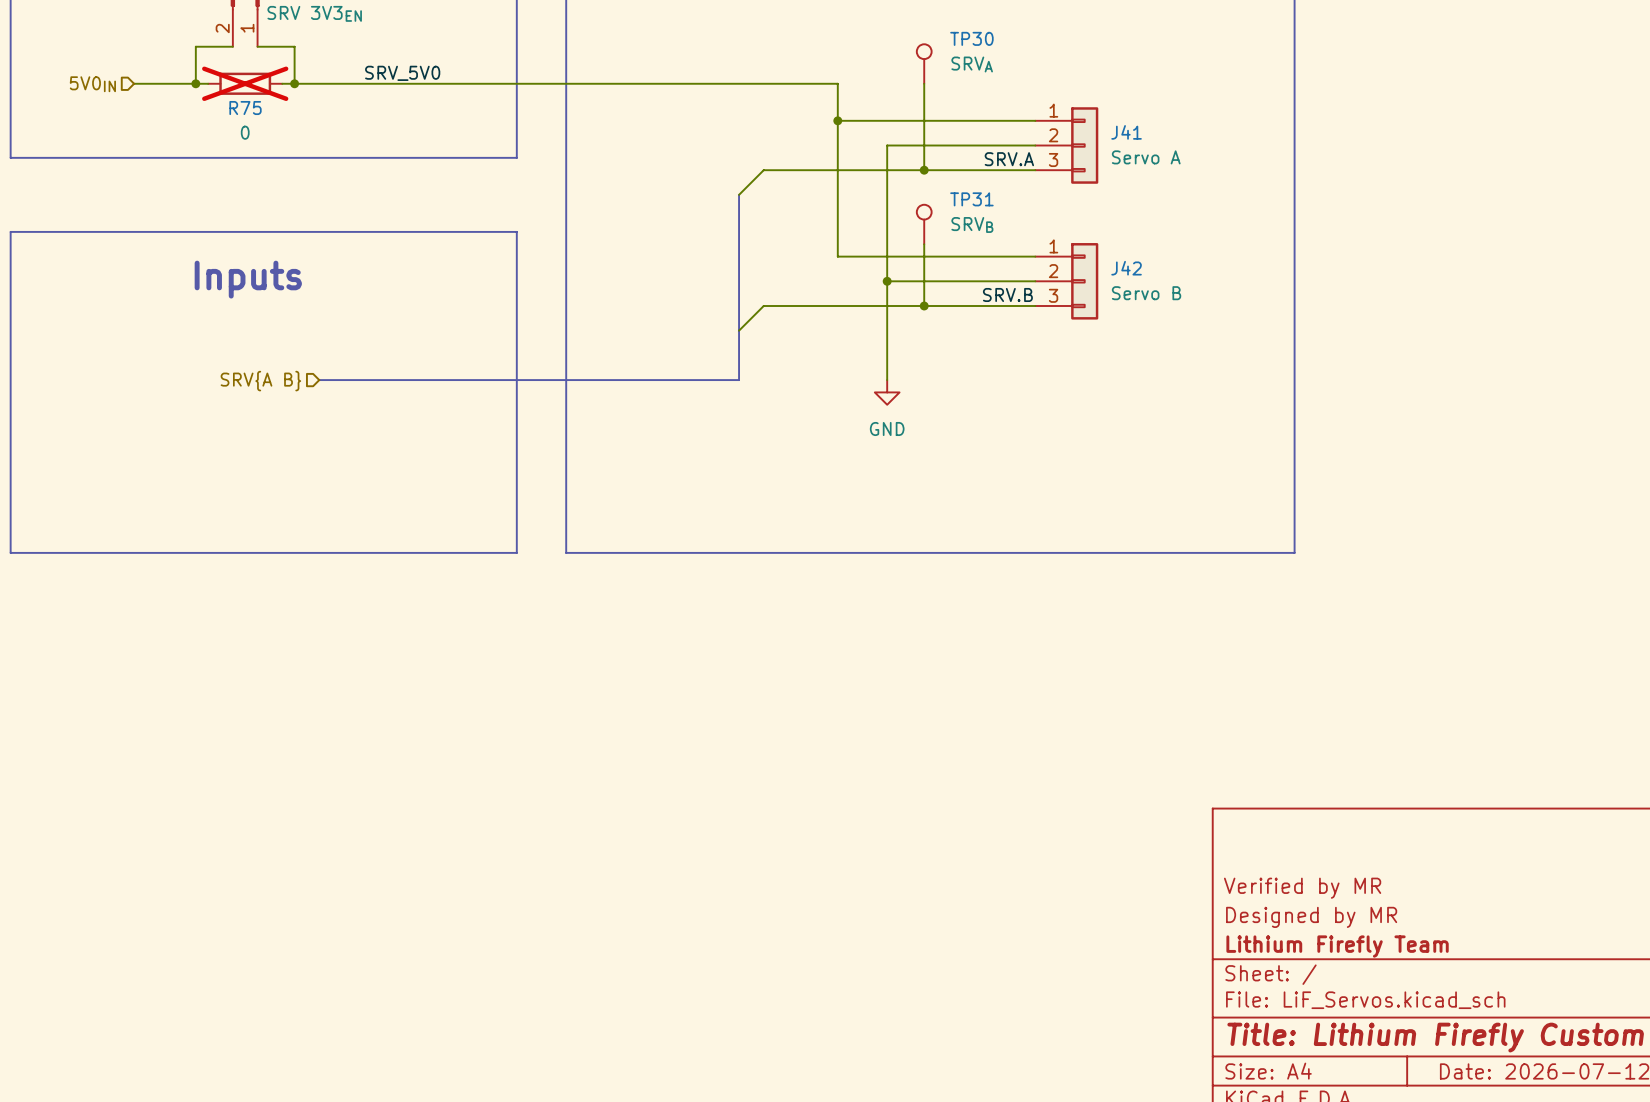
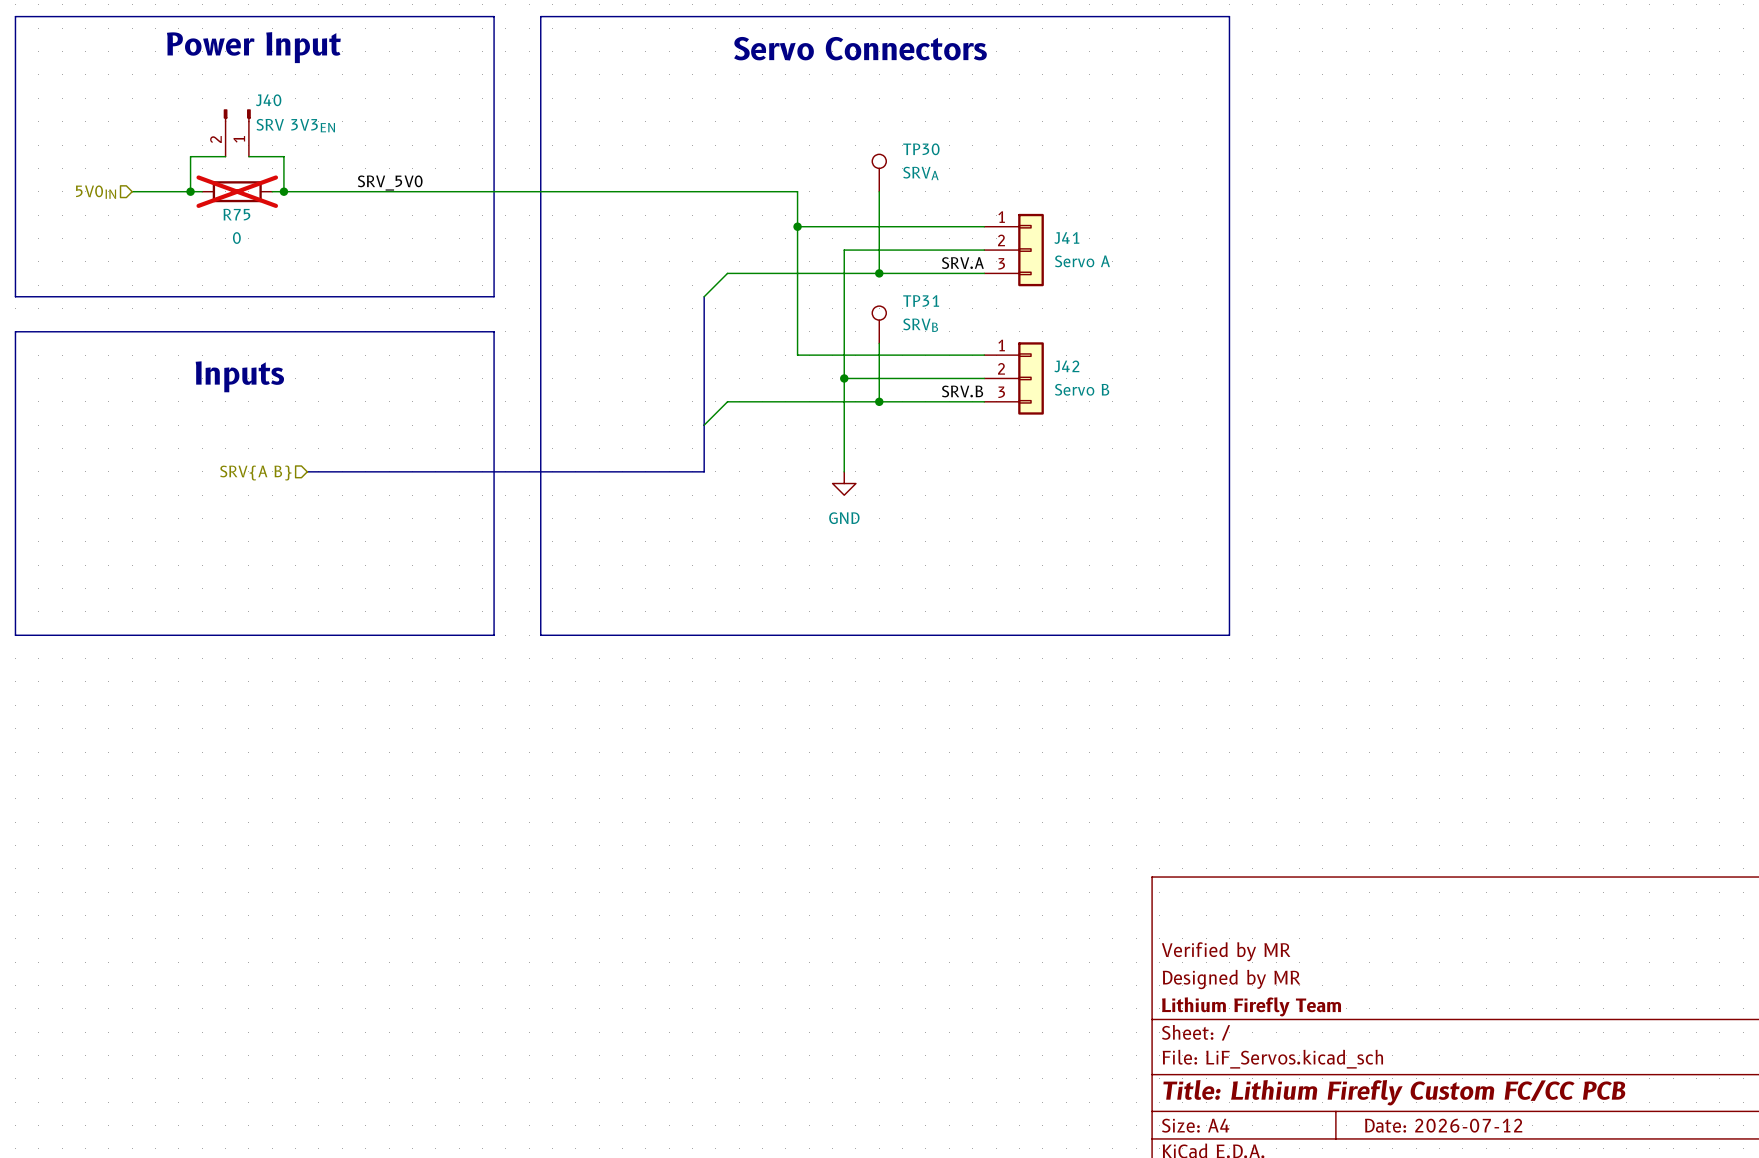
line: (10, 157) (516, 157) -> (15, 261) (15, 296) (494, 296) (494, 261)

